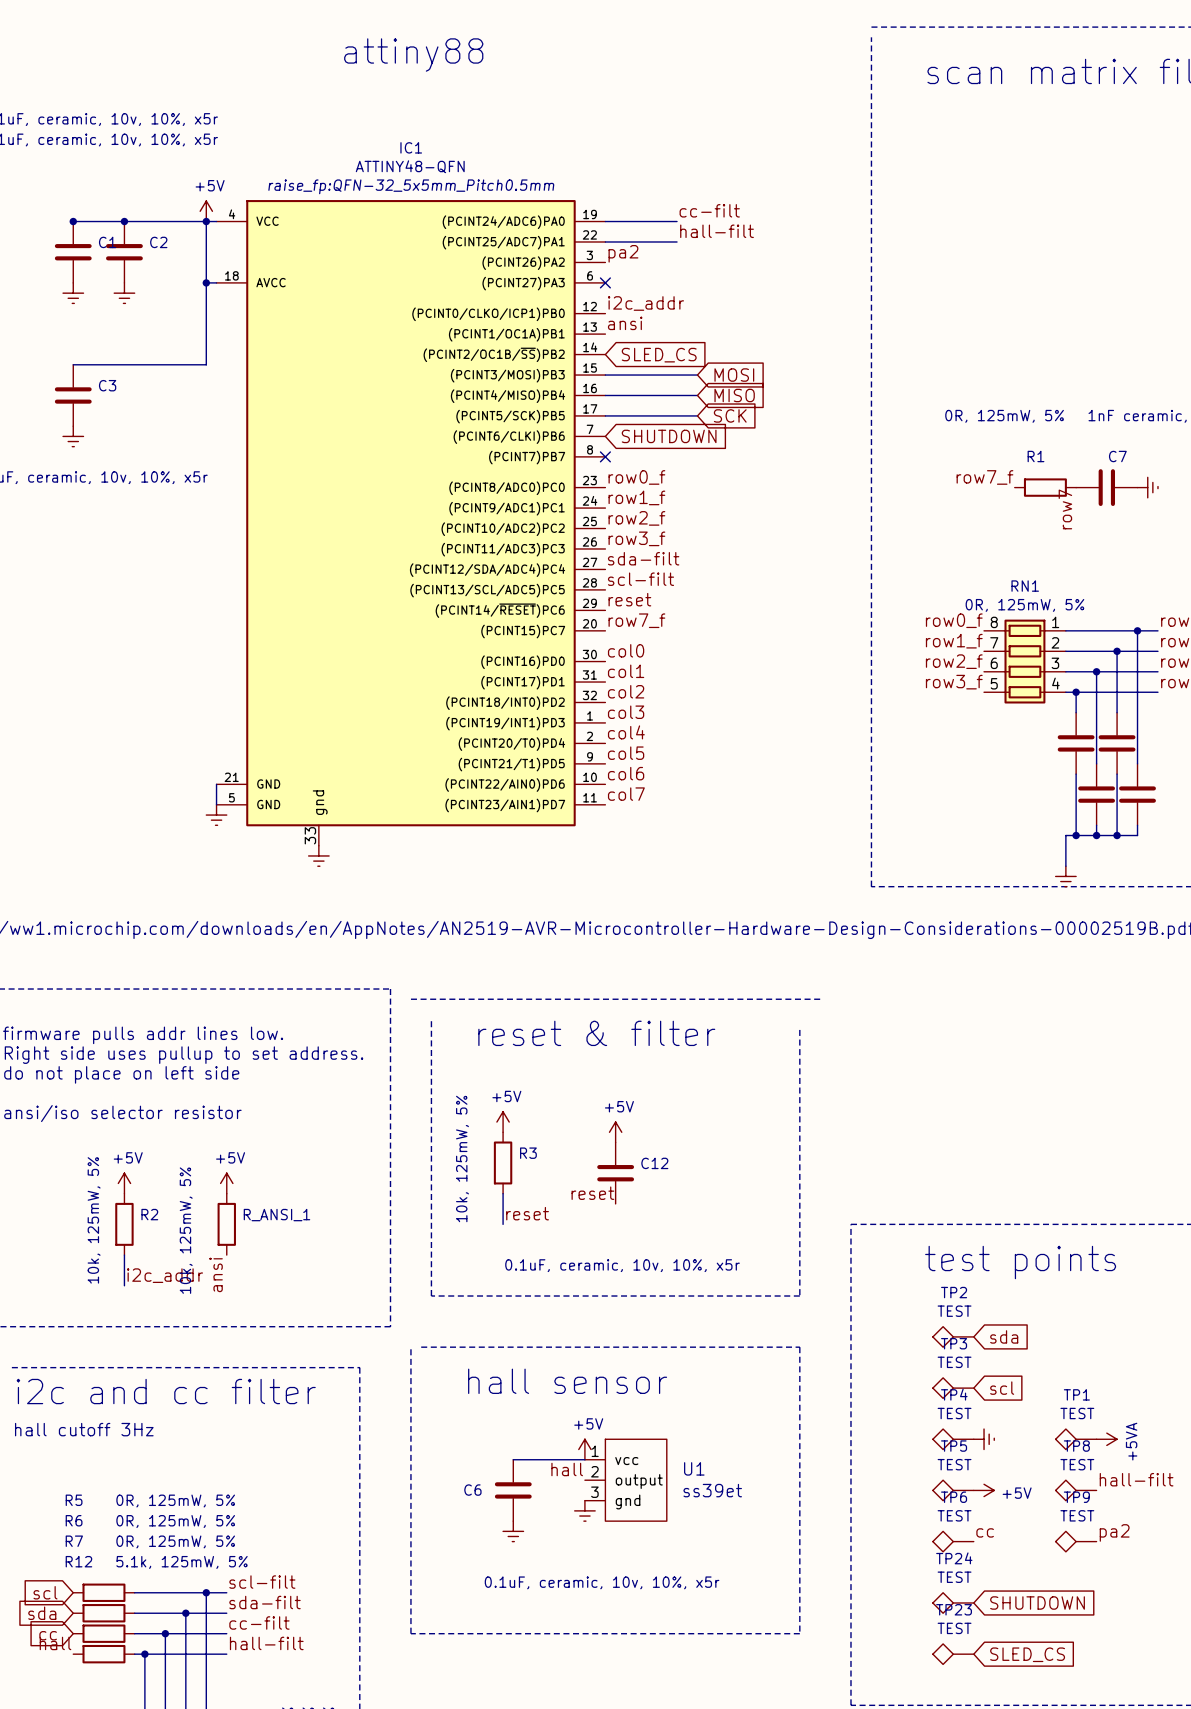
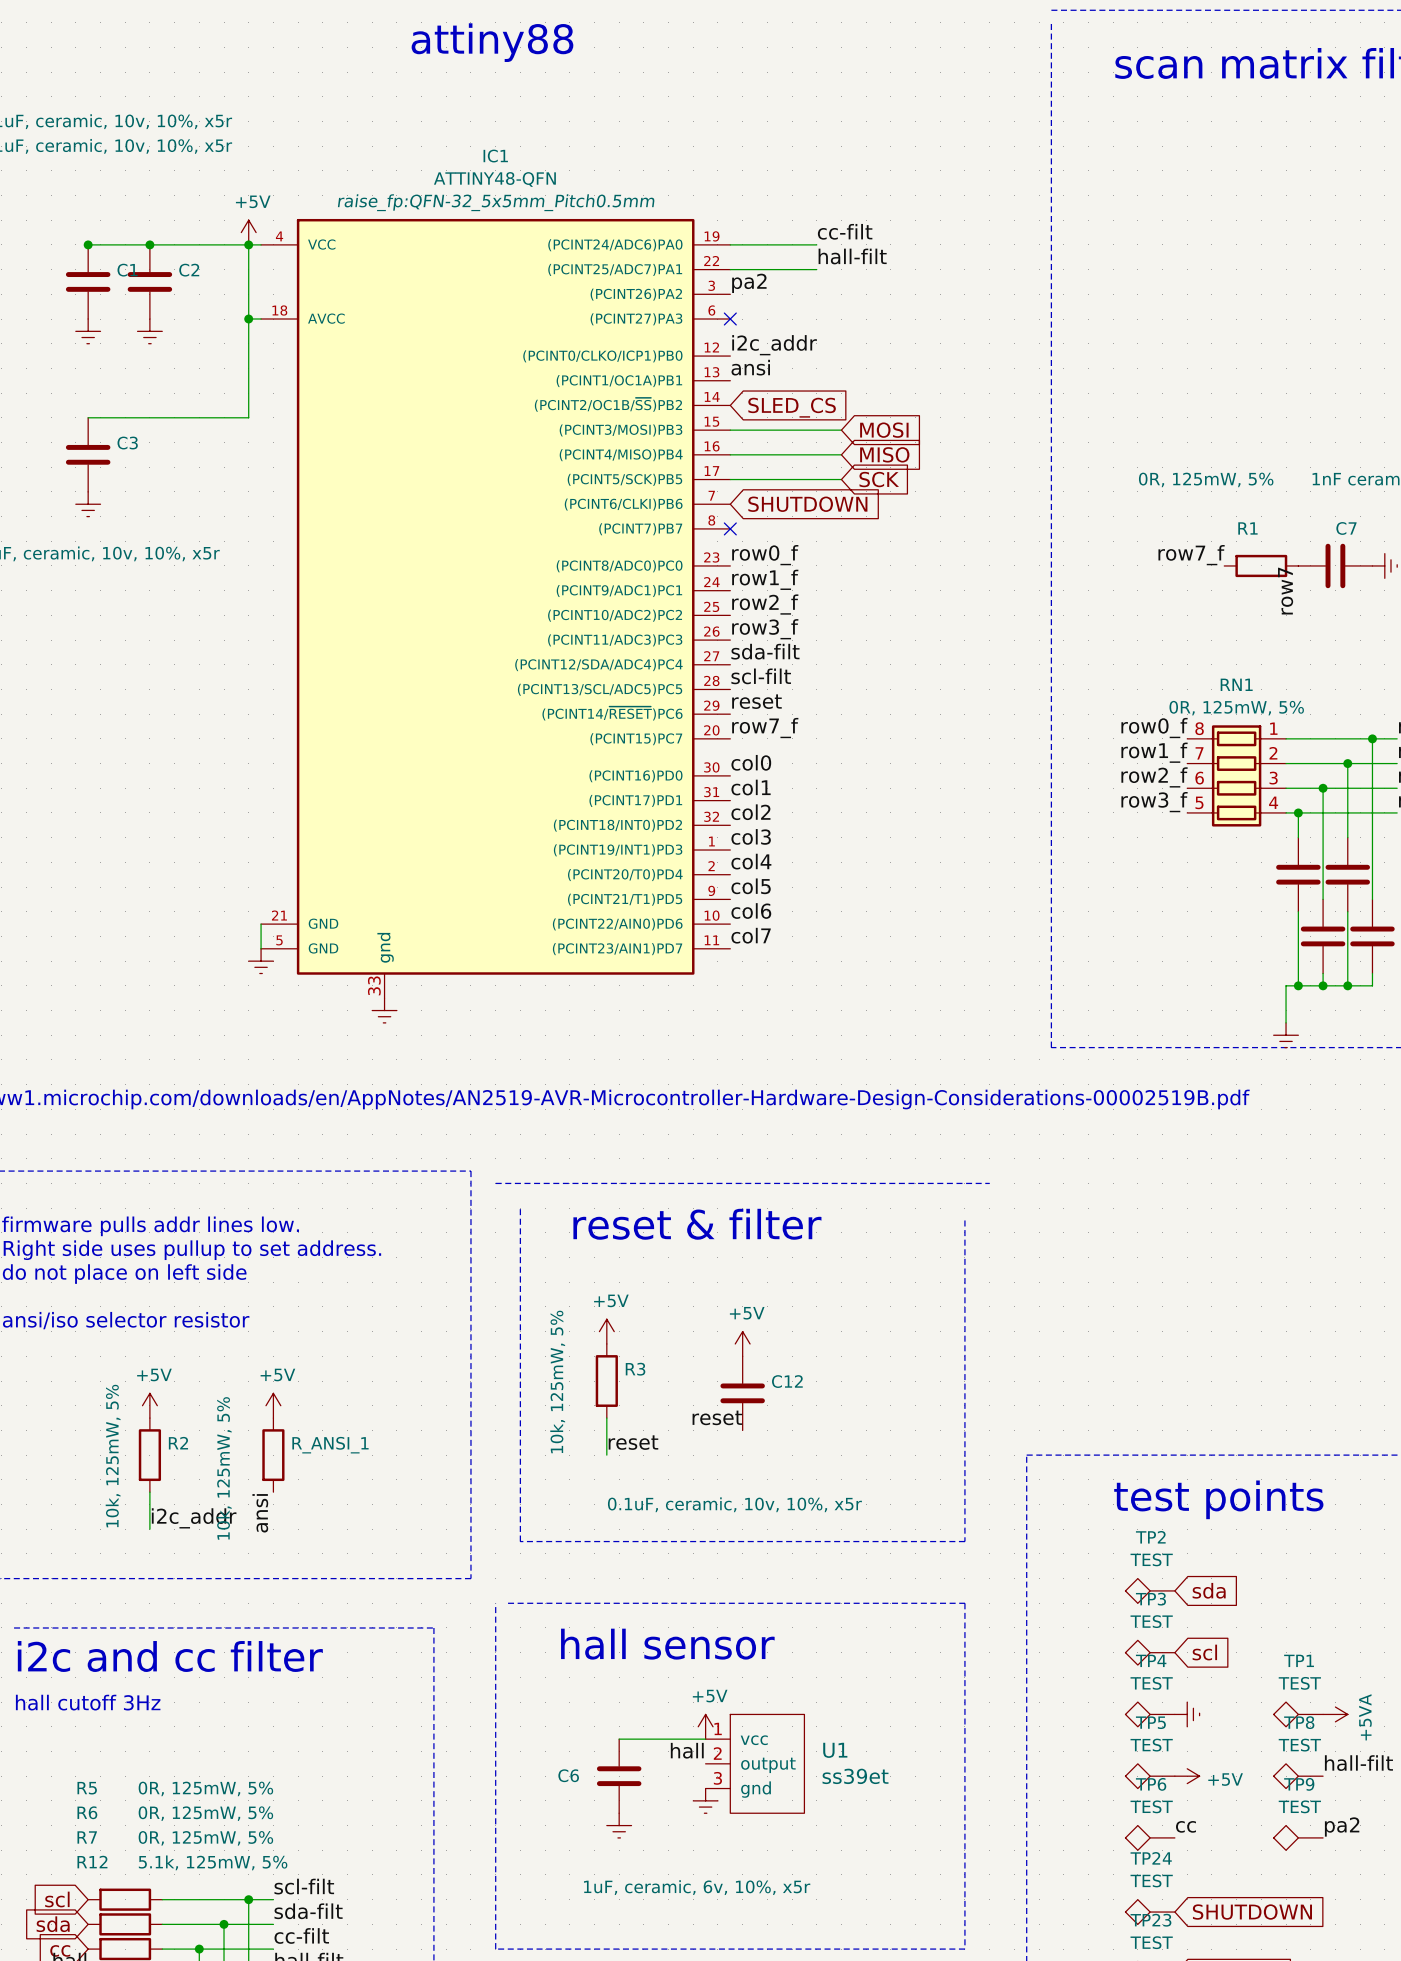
C6 value: 0.1uF, ceramic, 10v, 10%, x5r (602, 1582) -> 1uF, ceramic, 6v, 10%, x5r (697, 1887)

